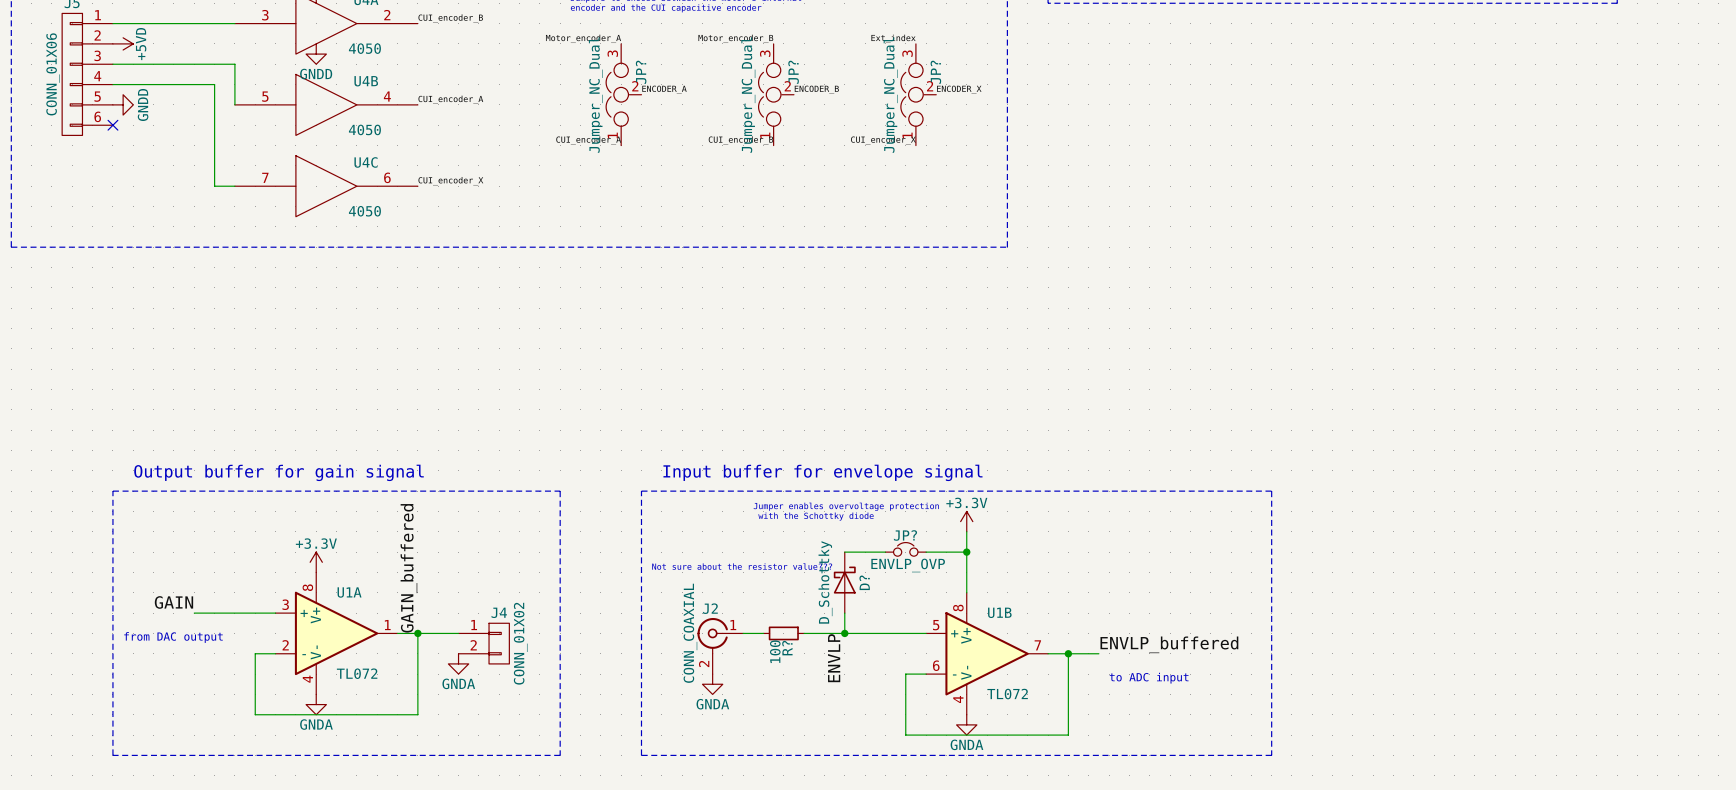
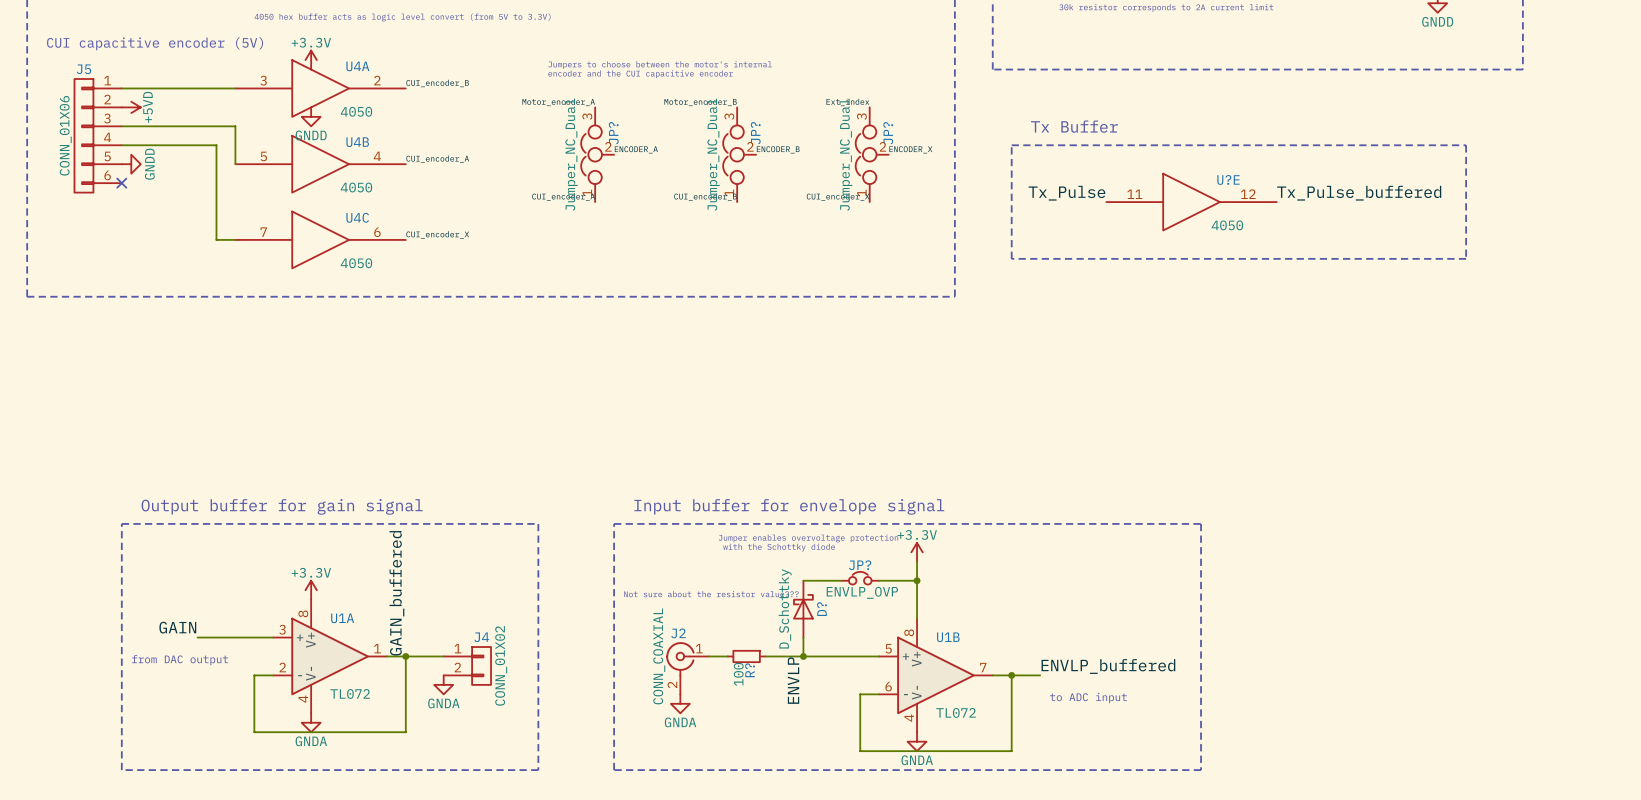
text: none -> Tx Buffer (1074, 126)
line: none -> (1011, 145) (1466, 145) (1466, 258) (1011, 258) (1011, 145)
label: none -> Tx_Pulse (1066, 193)
label: none -> Tx_Pulse_buffered (1359, 193)
U?E: none -> 4050 (1191, 202)

